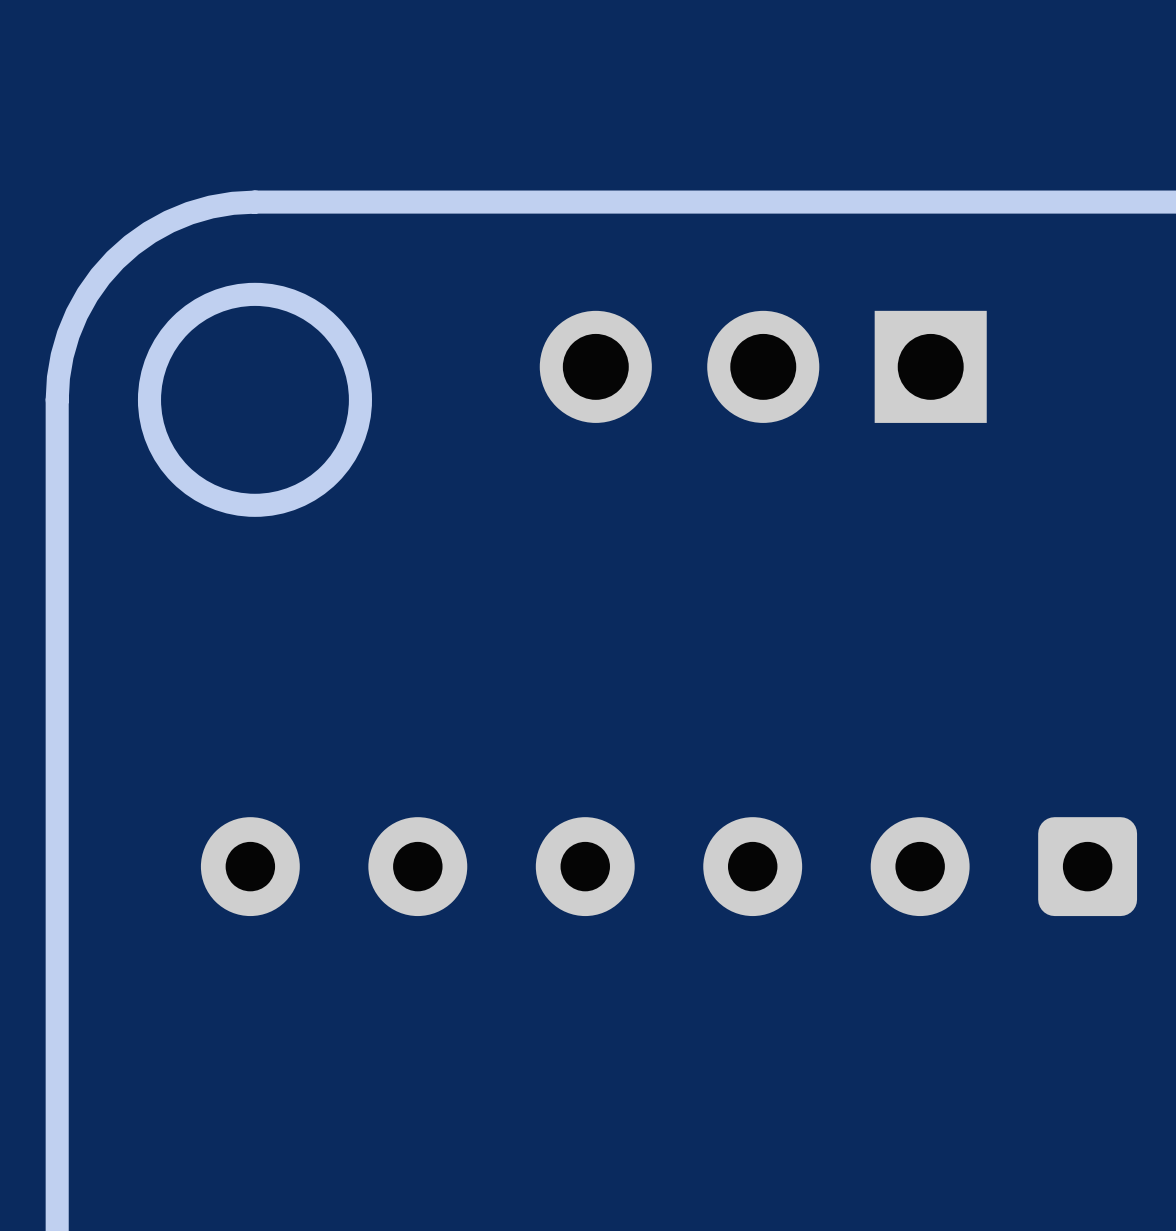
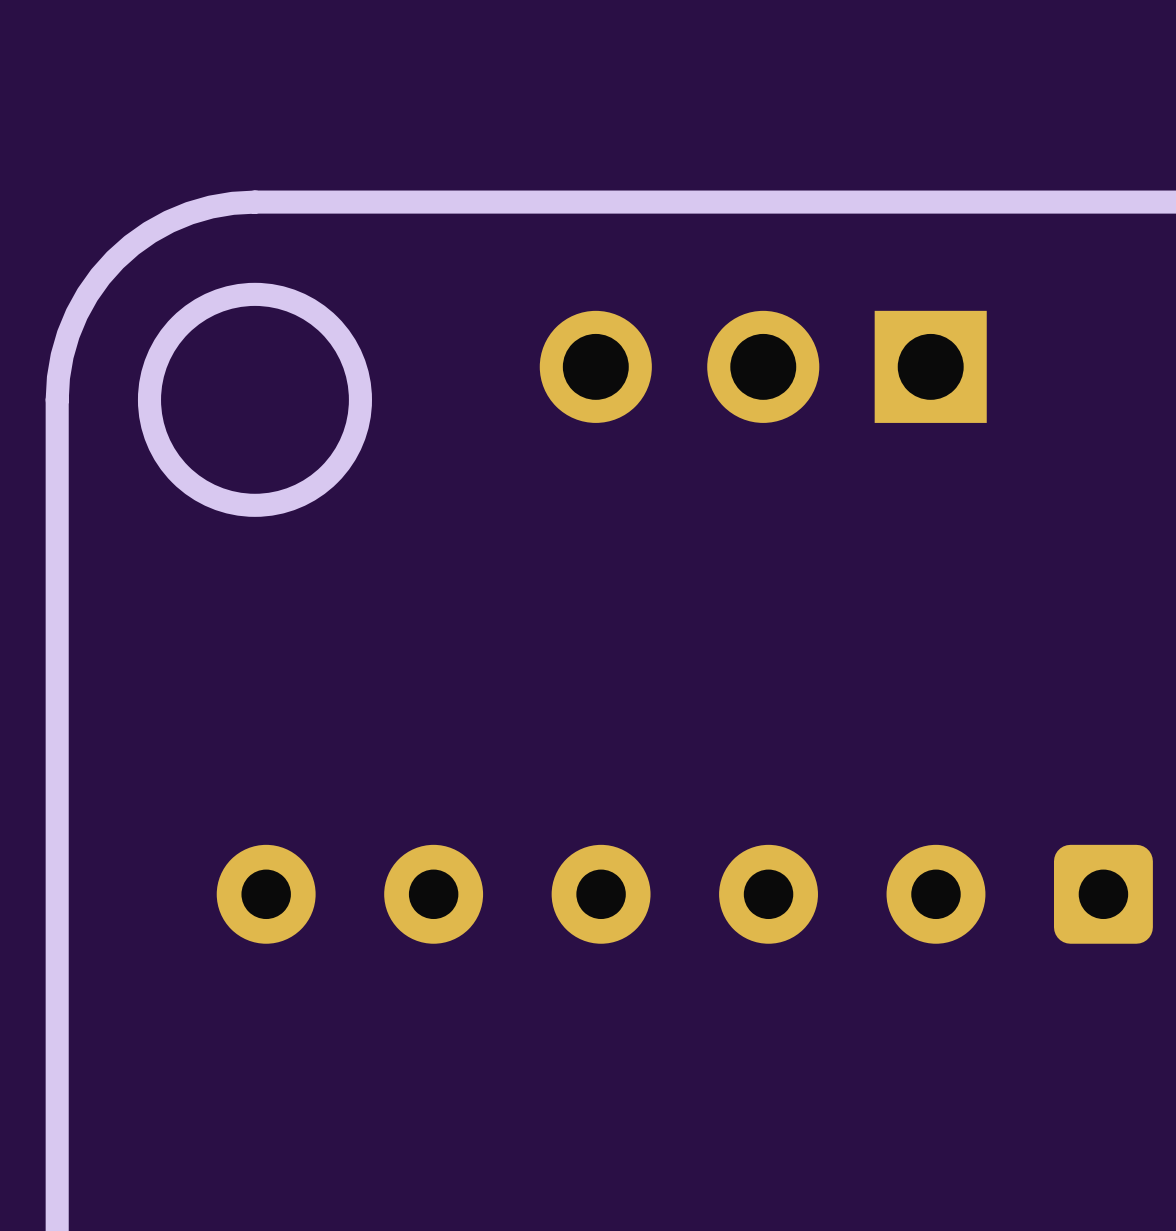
part position: (668, 866) -> (684, 894)

